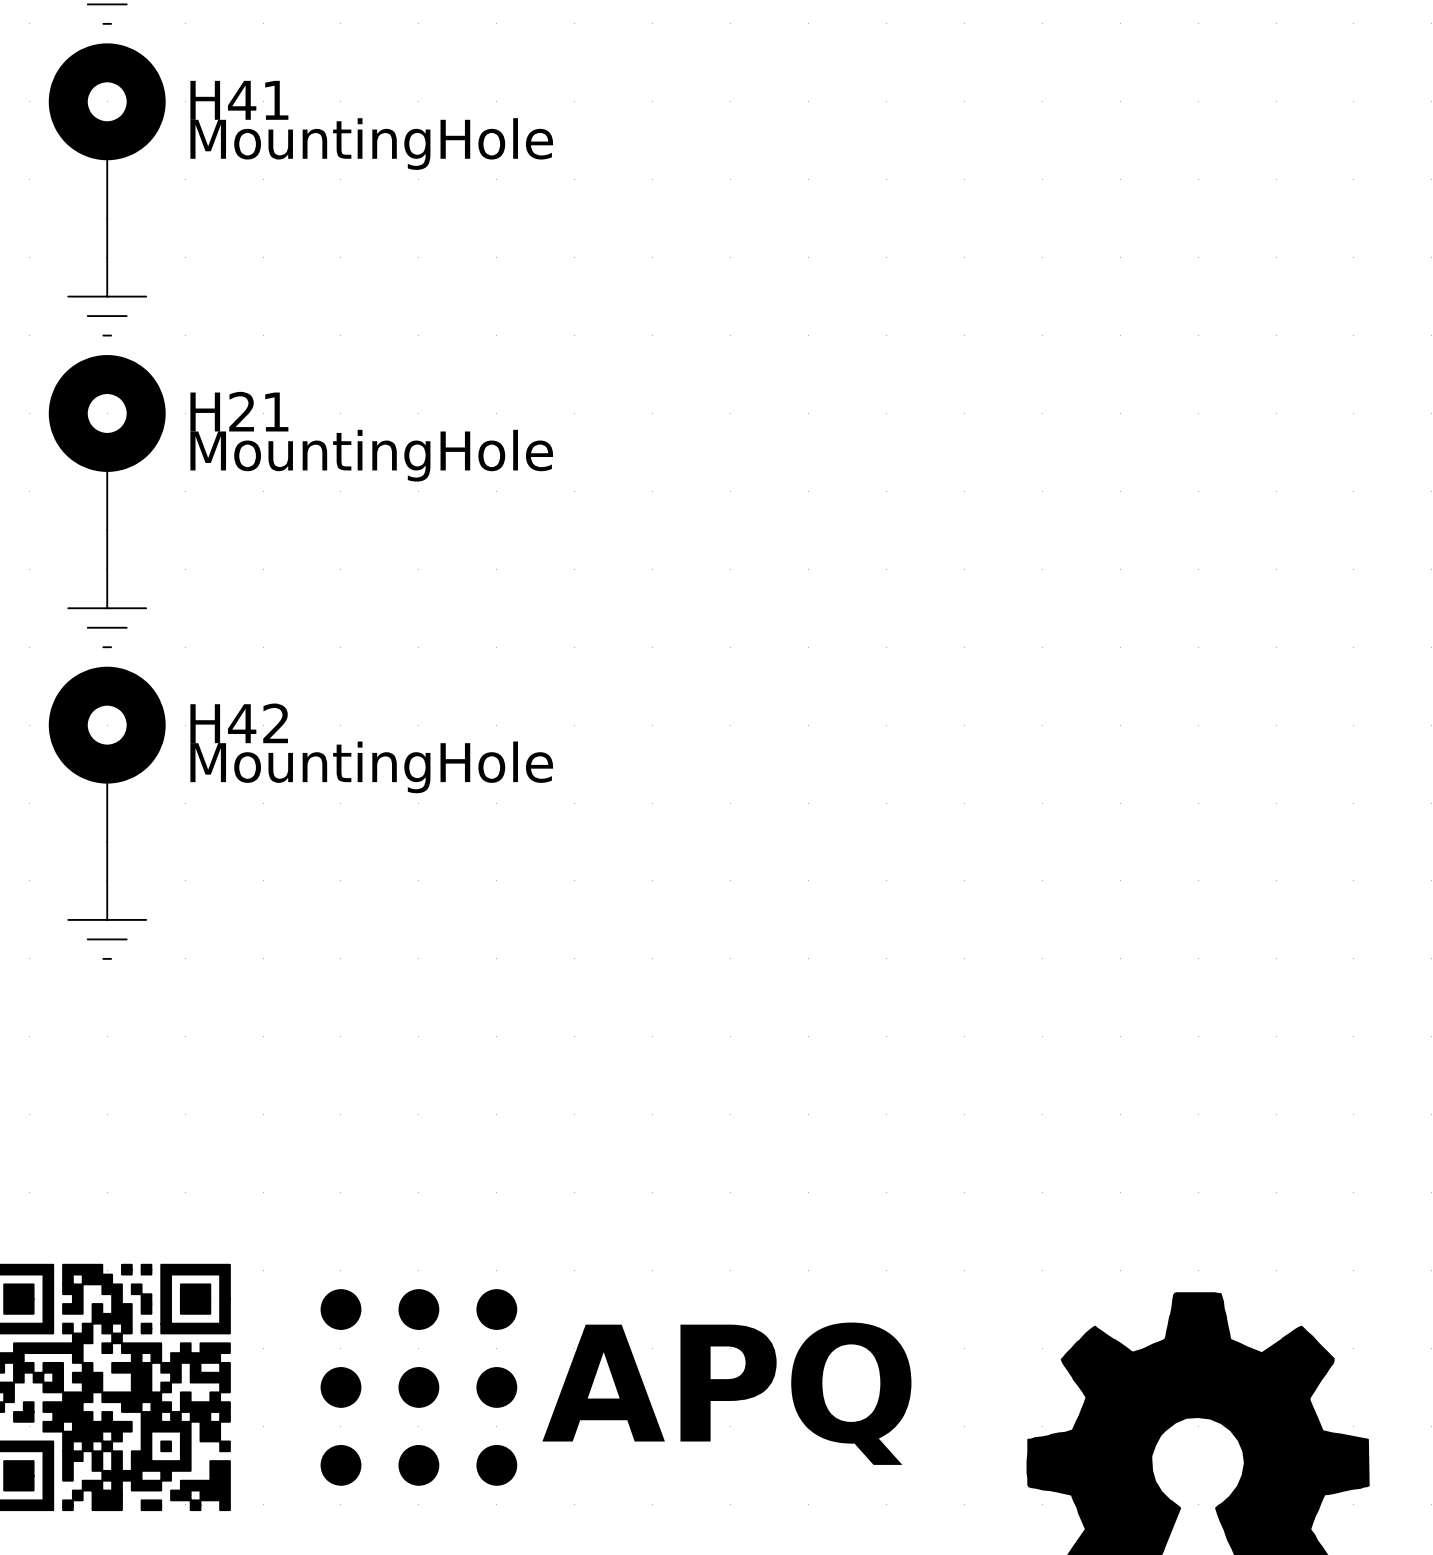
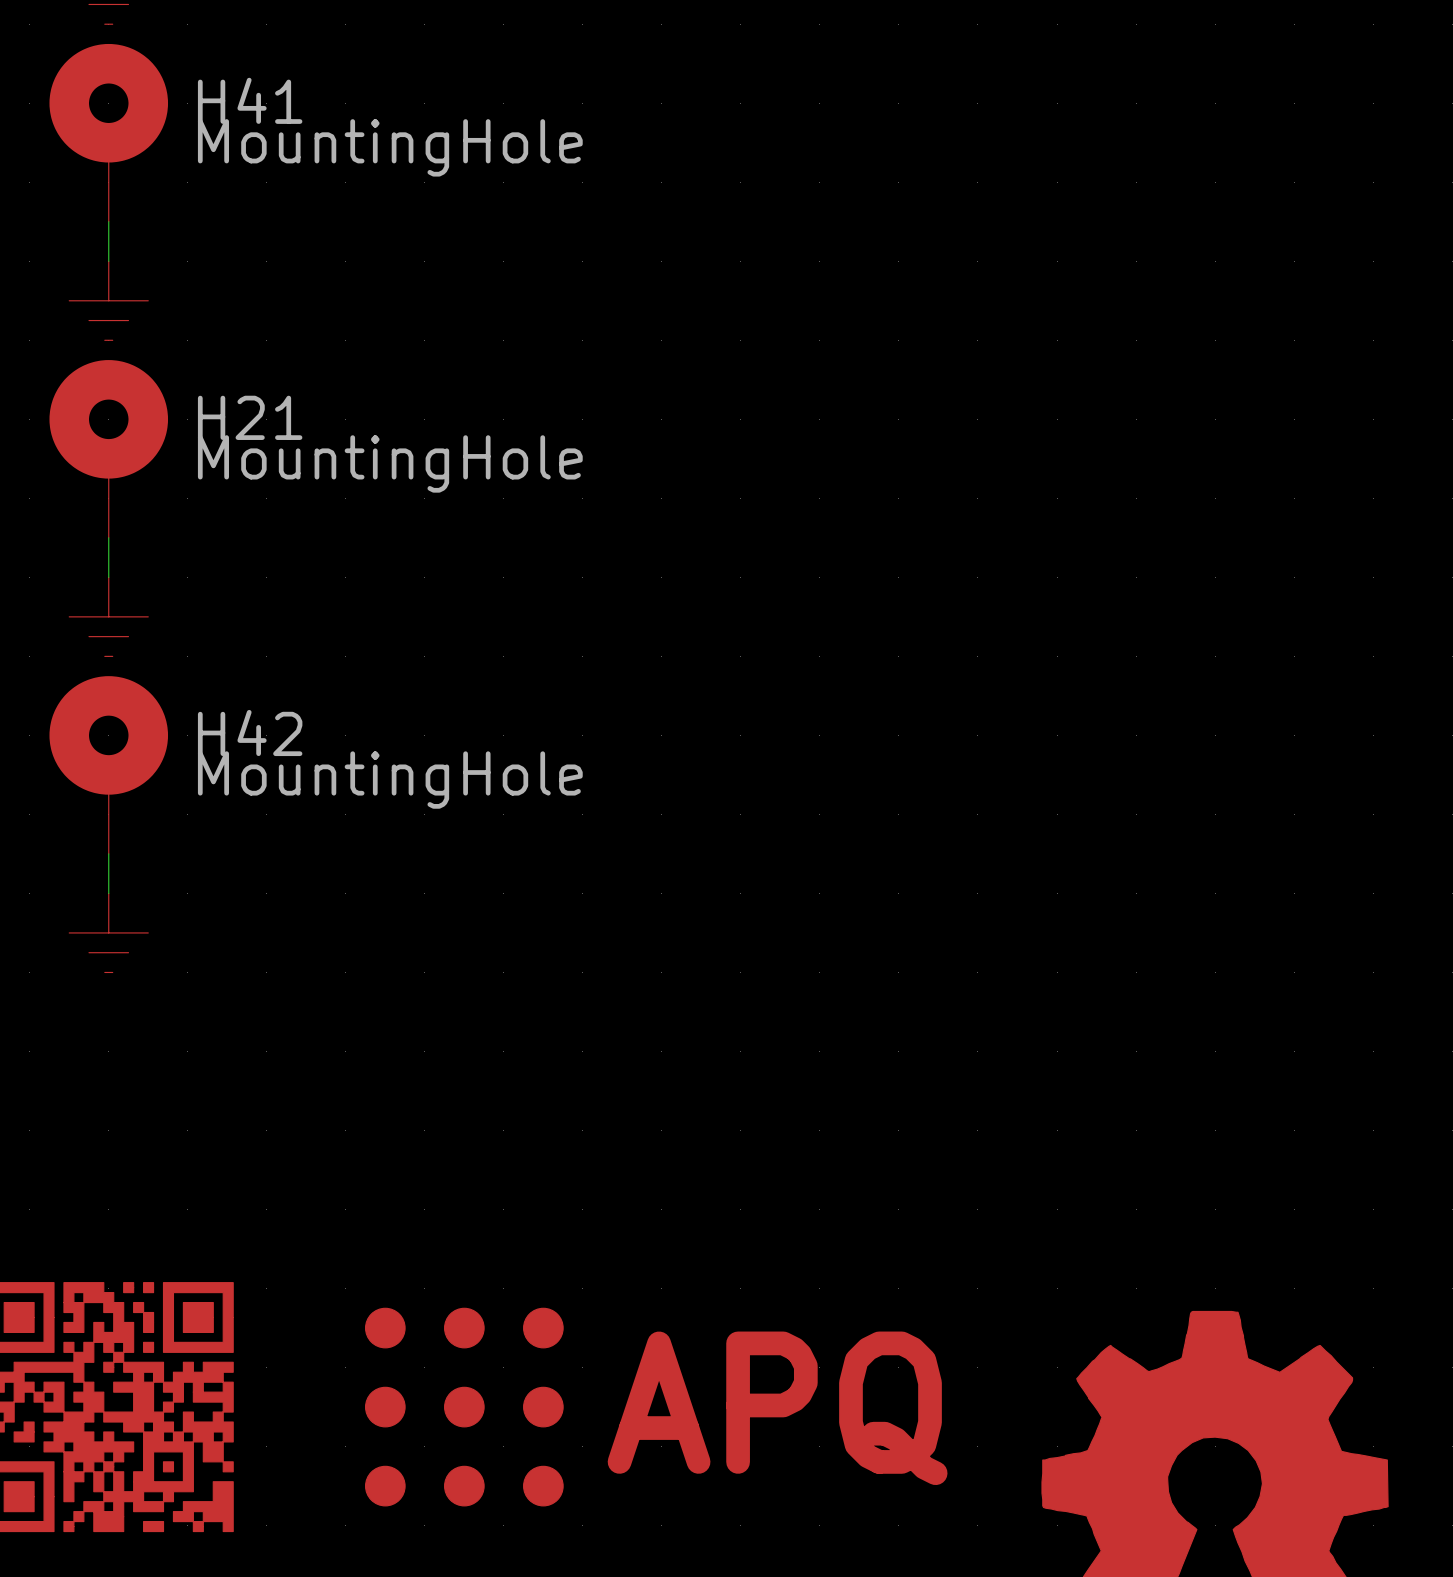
part position: (418, 1387) -> (464, 1407)

